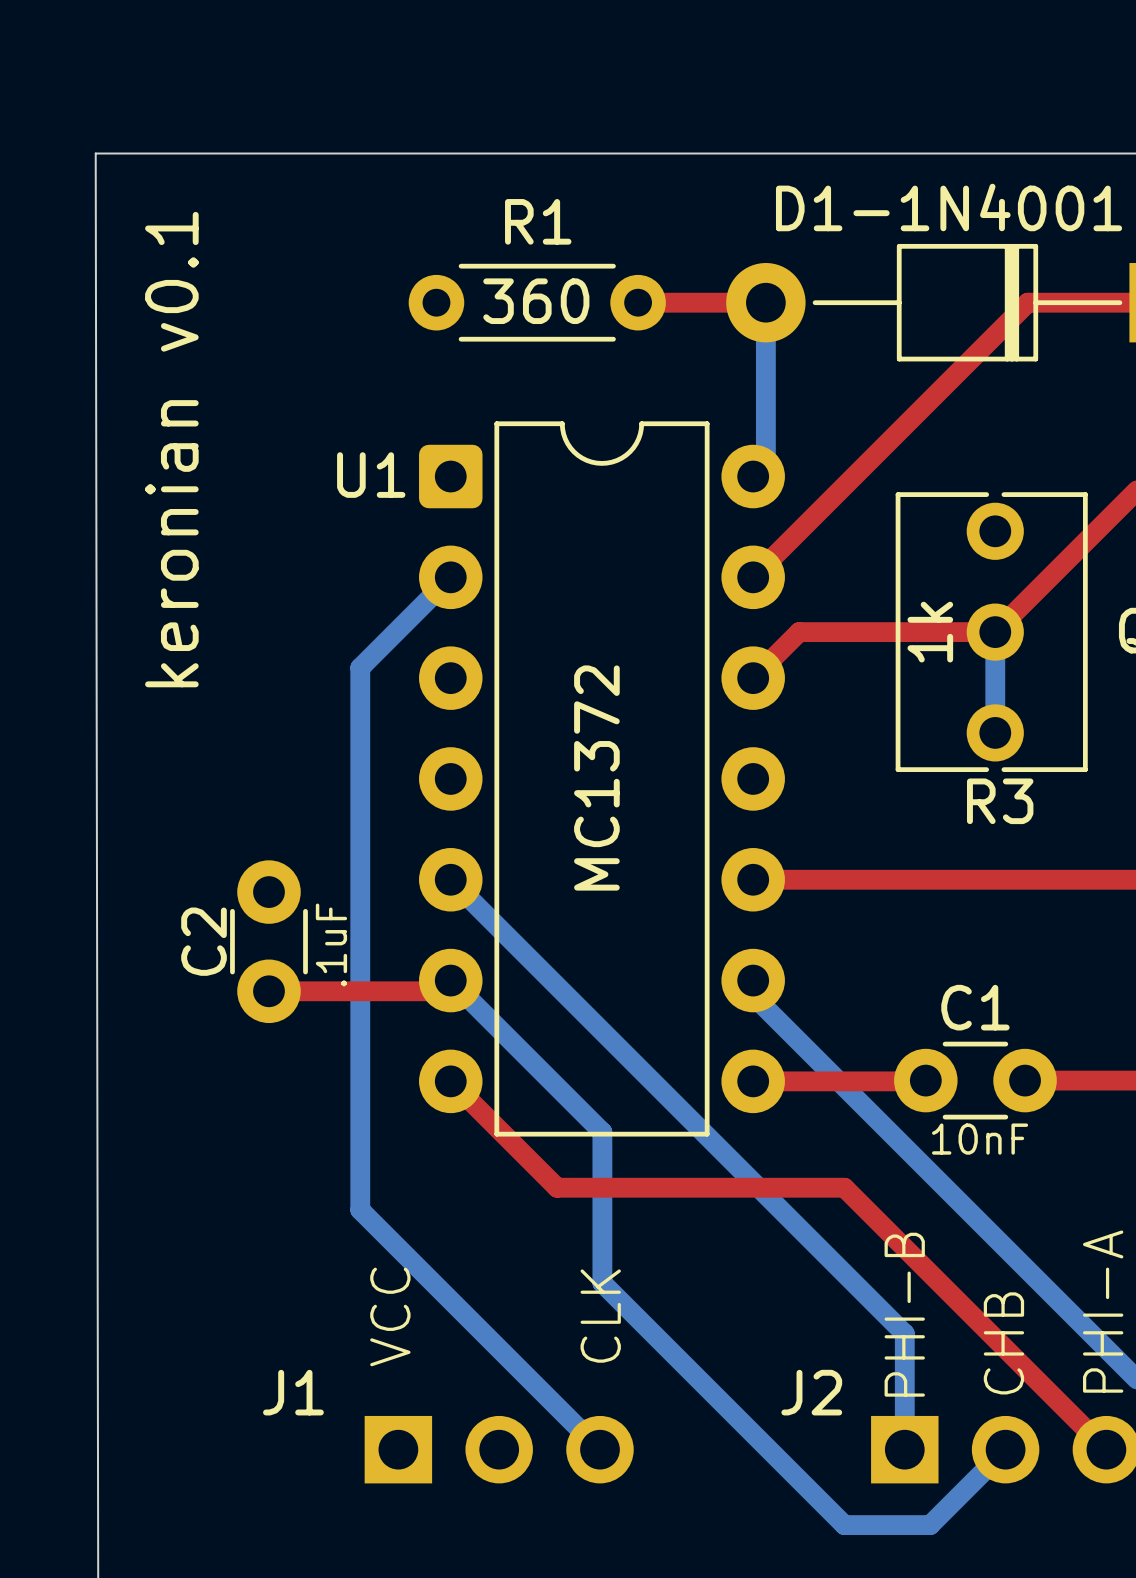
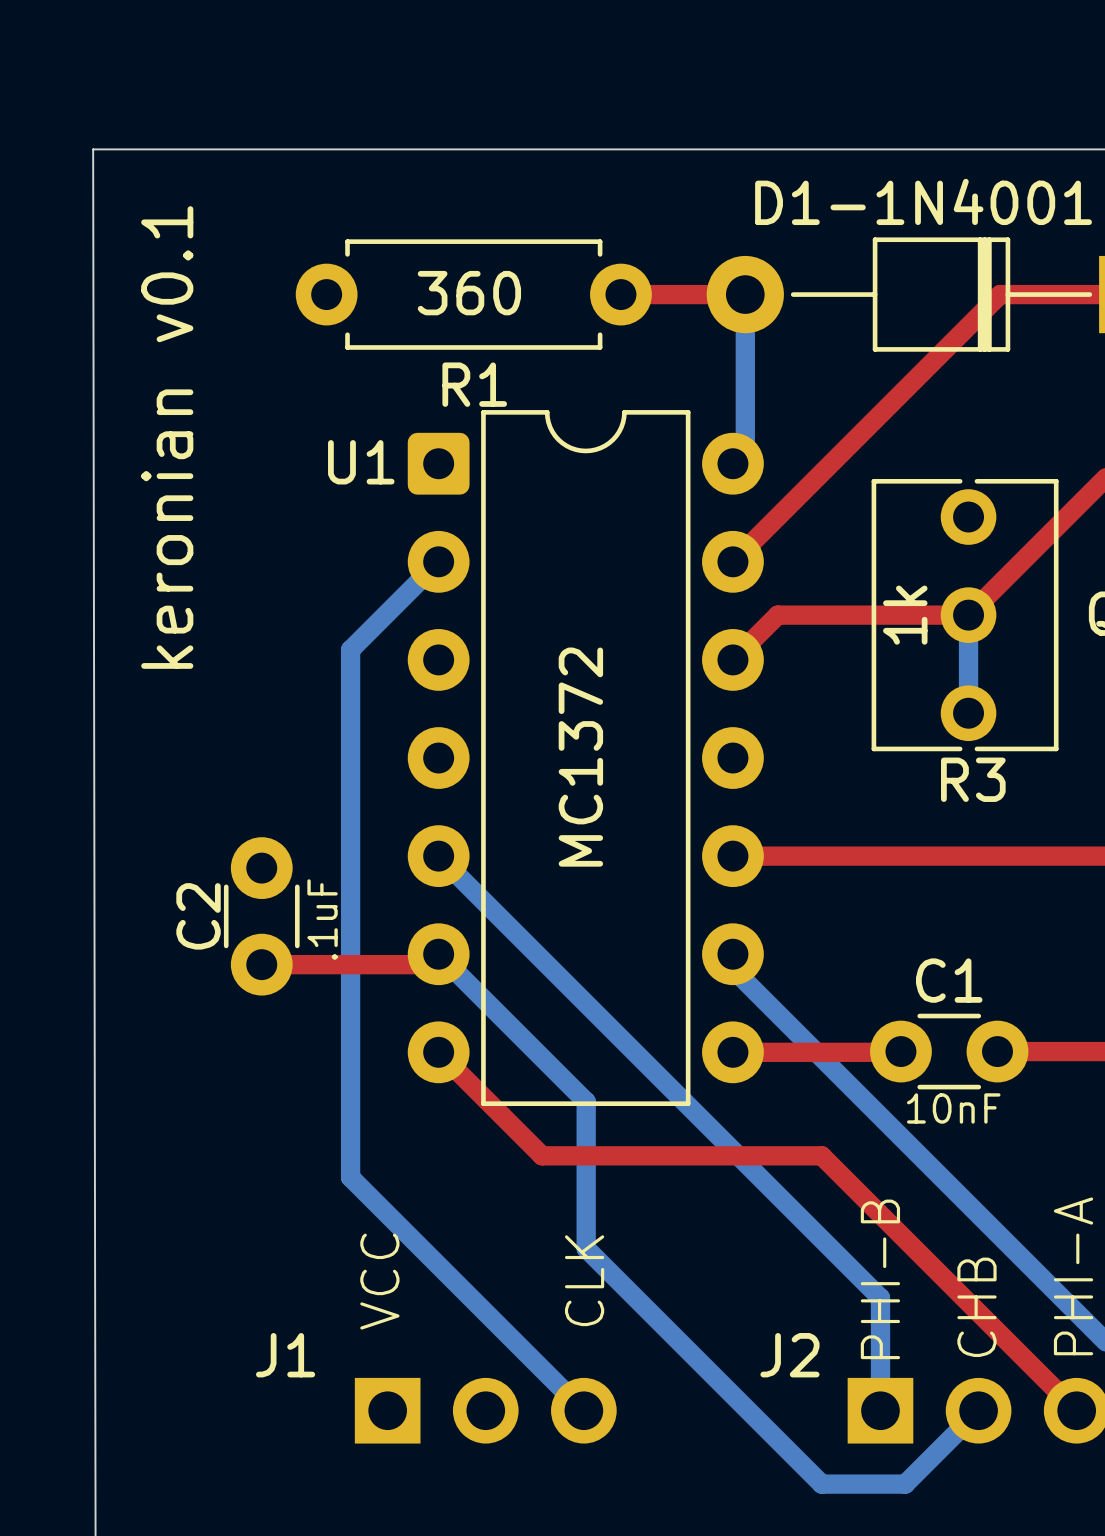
R1 name position: R1 (538, 221) -> R1 (474, 384)
R1 footprint: [408, 263, 666, 342] -> [295, 239, 652, 350]

